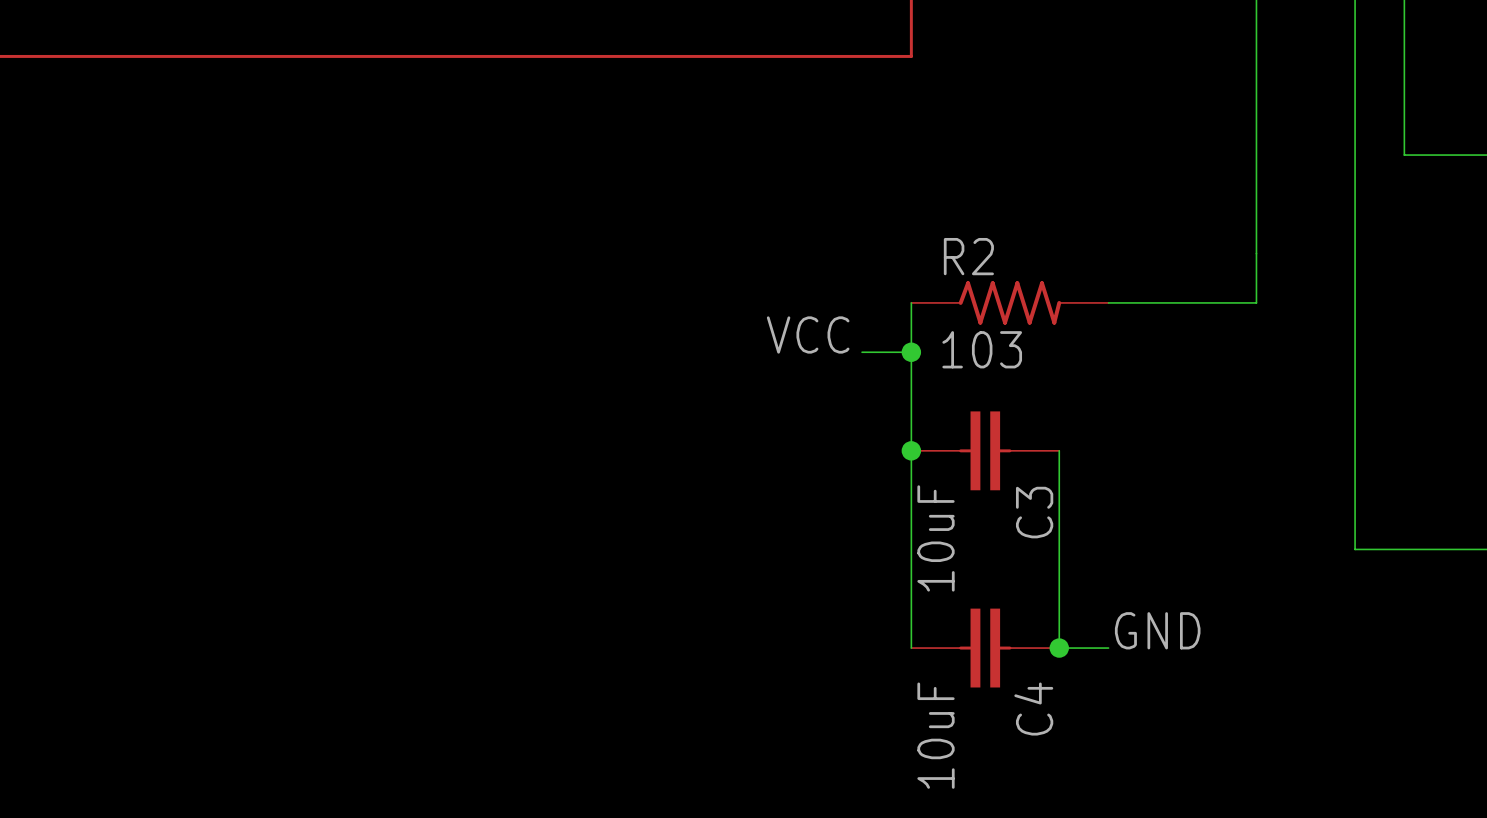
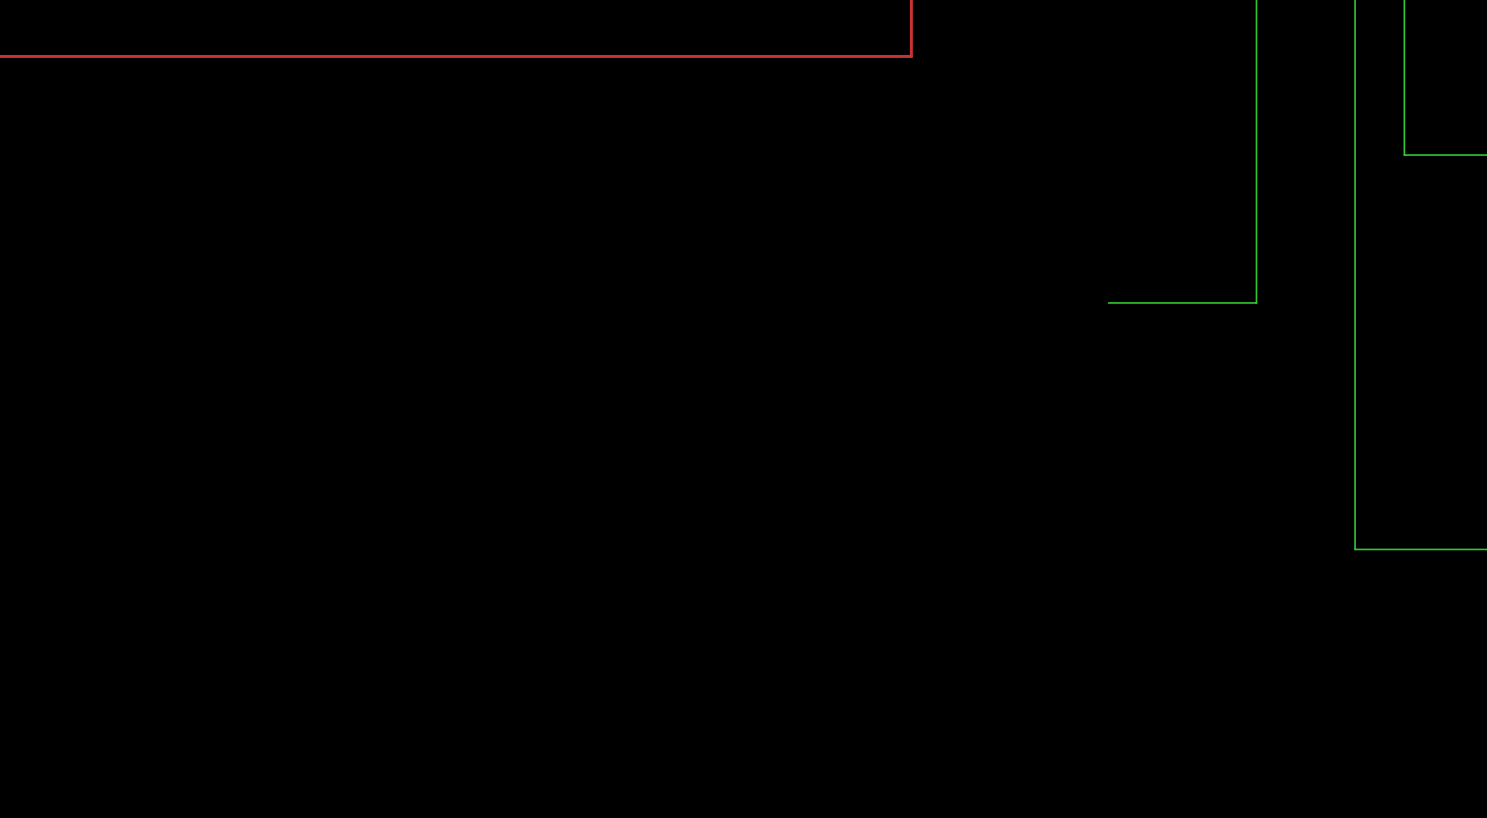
wire: (911, 302) (911, 648) -> none
R2: 103 (1009, 302) -> none
label: VCC (808, 334) -> none
wire: (862, 352) (911, 352) -> none
junction: (911, 352) -> none
junction: (911, 450) -> none
C3: 10uF (985, 450) -> none
wire: (1059, 450) (1059, 648) (1108, 648) -> none
label: GND (1157, 630) -> none
C4: 10uF (985, 648) -> none
junction: (1059, 648) -> none

